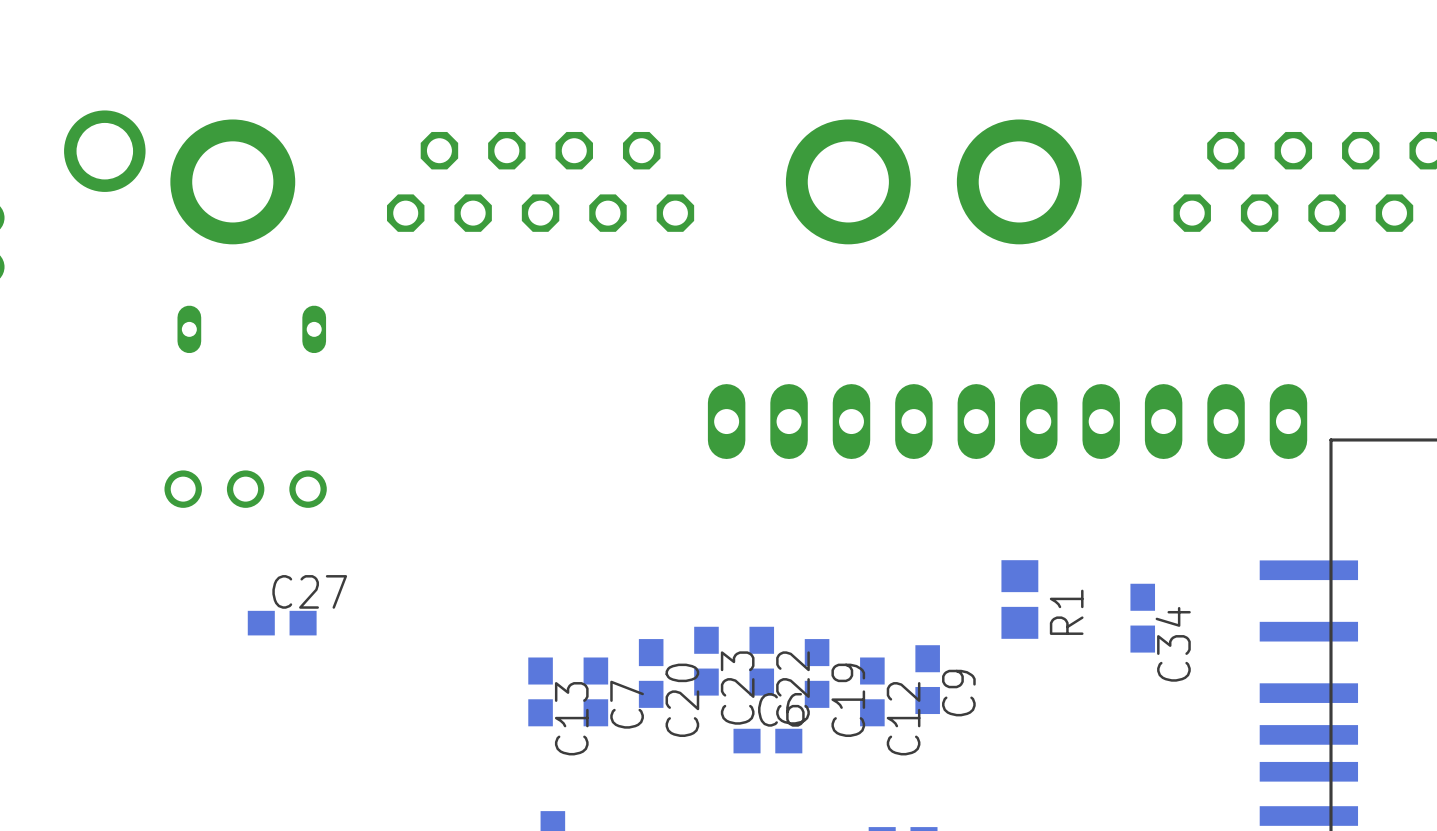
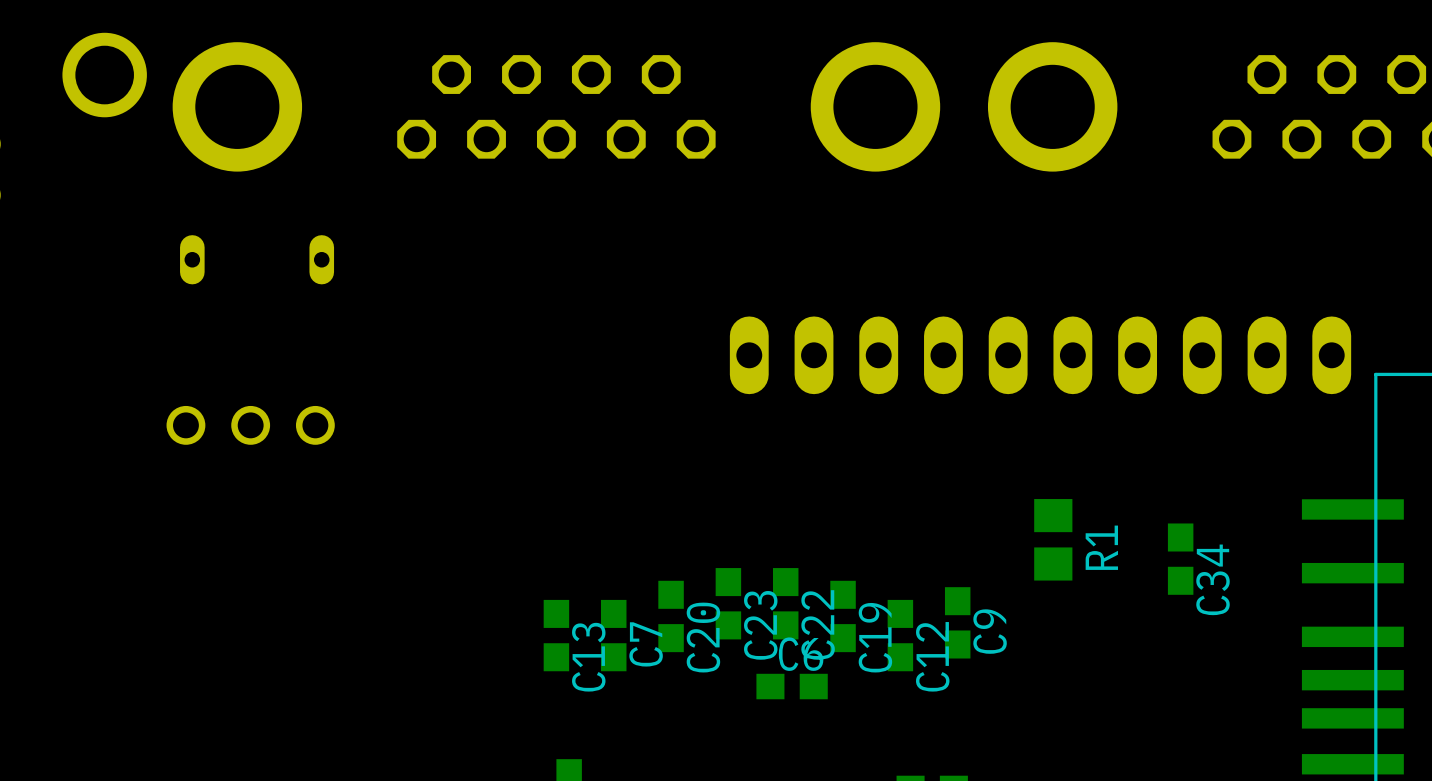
C27: (282, 623) -> none

